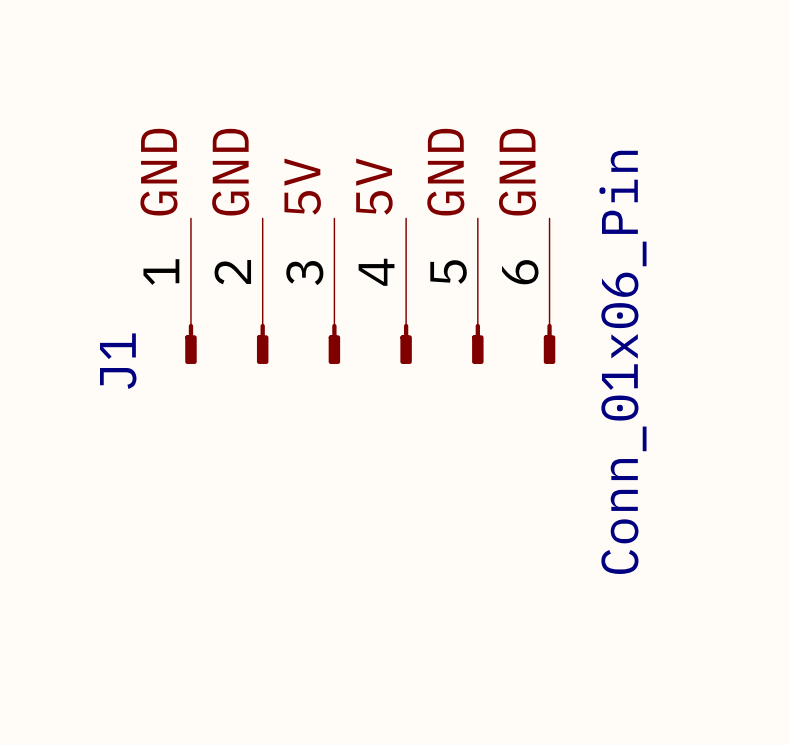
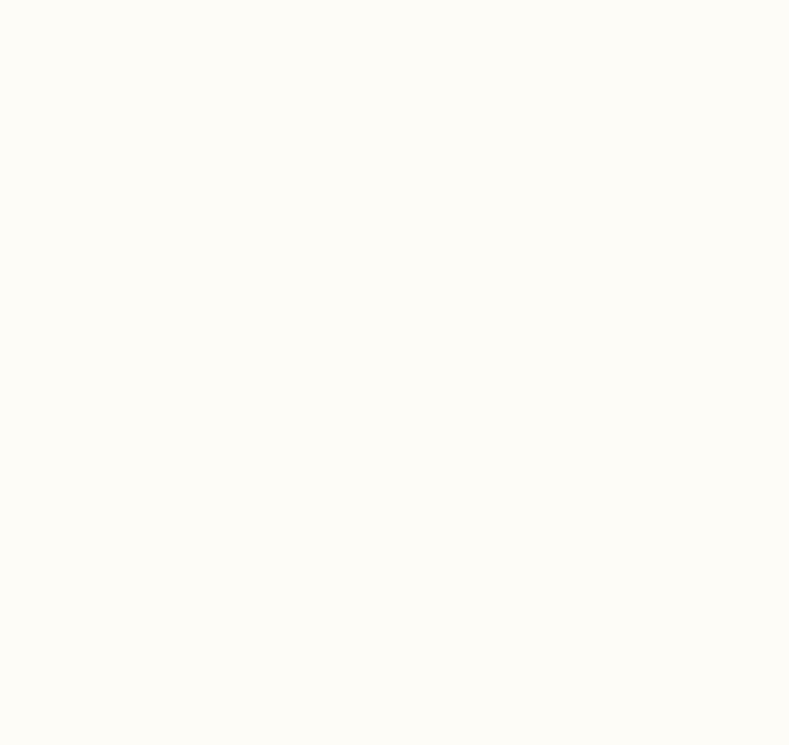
label: GND (158, 172) -> none
label: GND (230, 172) -> none
label: GND (445, 172) -> none
label: GND (517, 172) -> none
label: 5V (302, 186) -> none
label: 5V (374, 186) -> none
J1: Conn_01x06_Pin (370, 291) -> none

